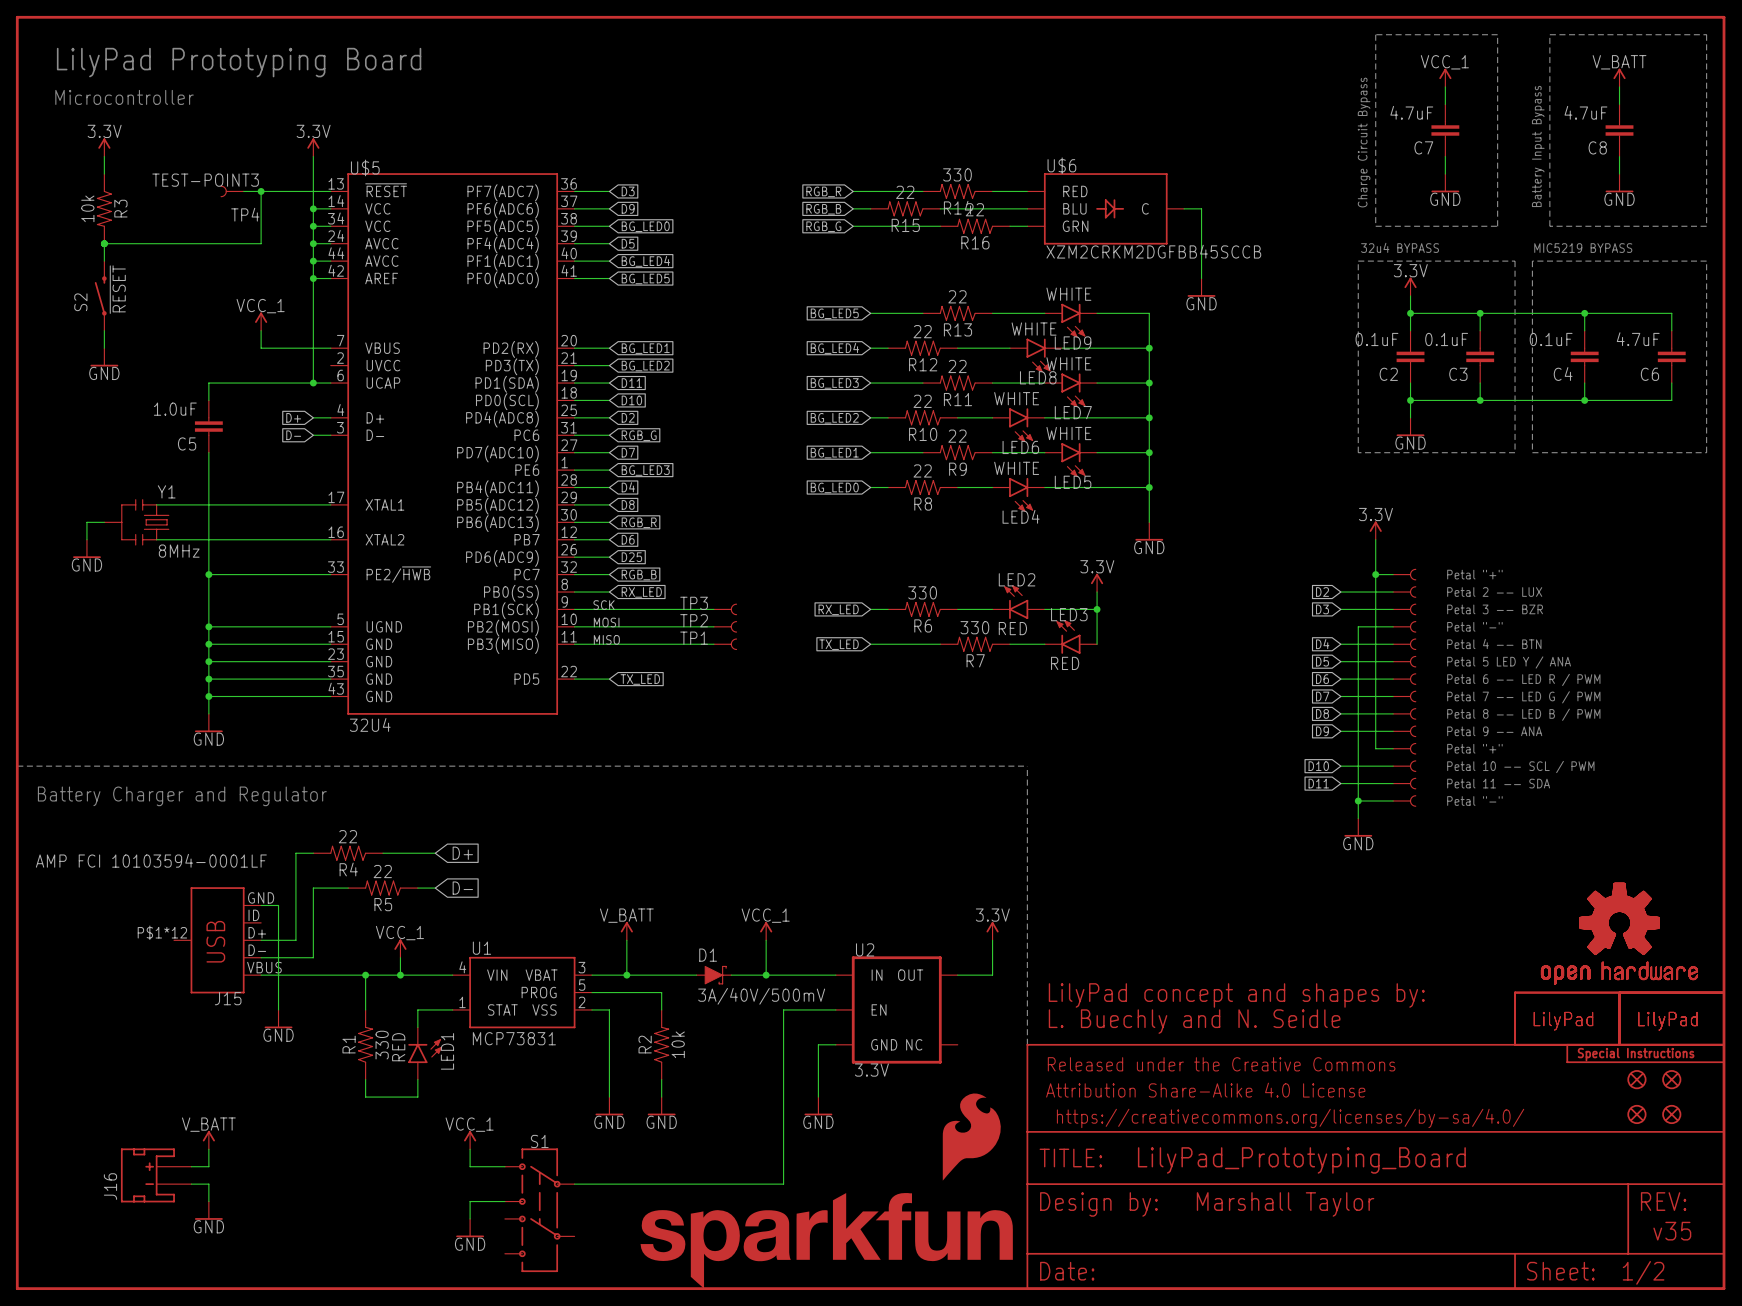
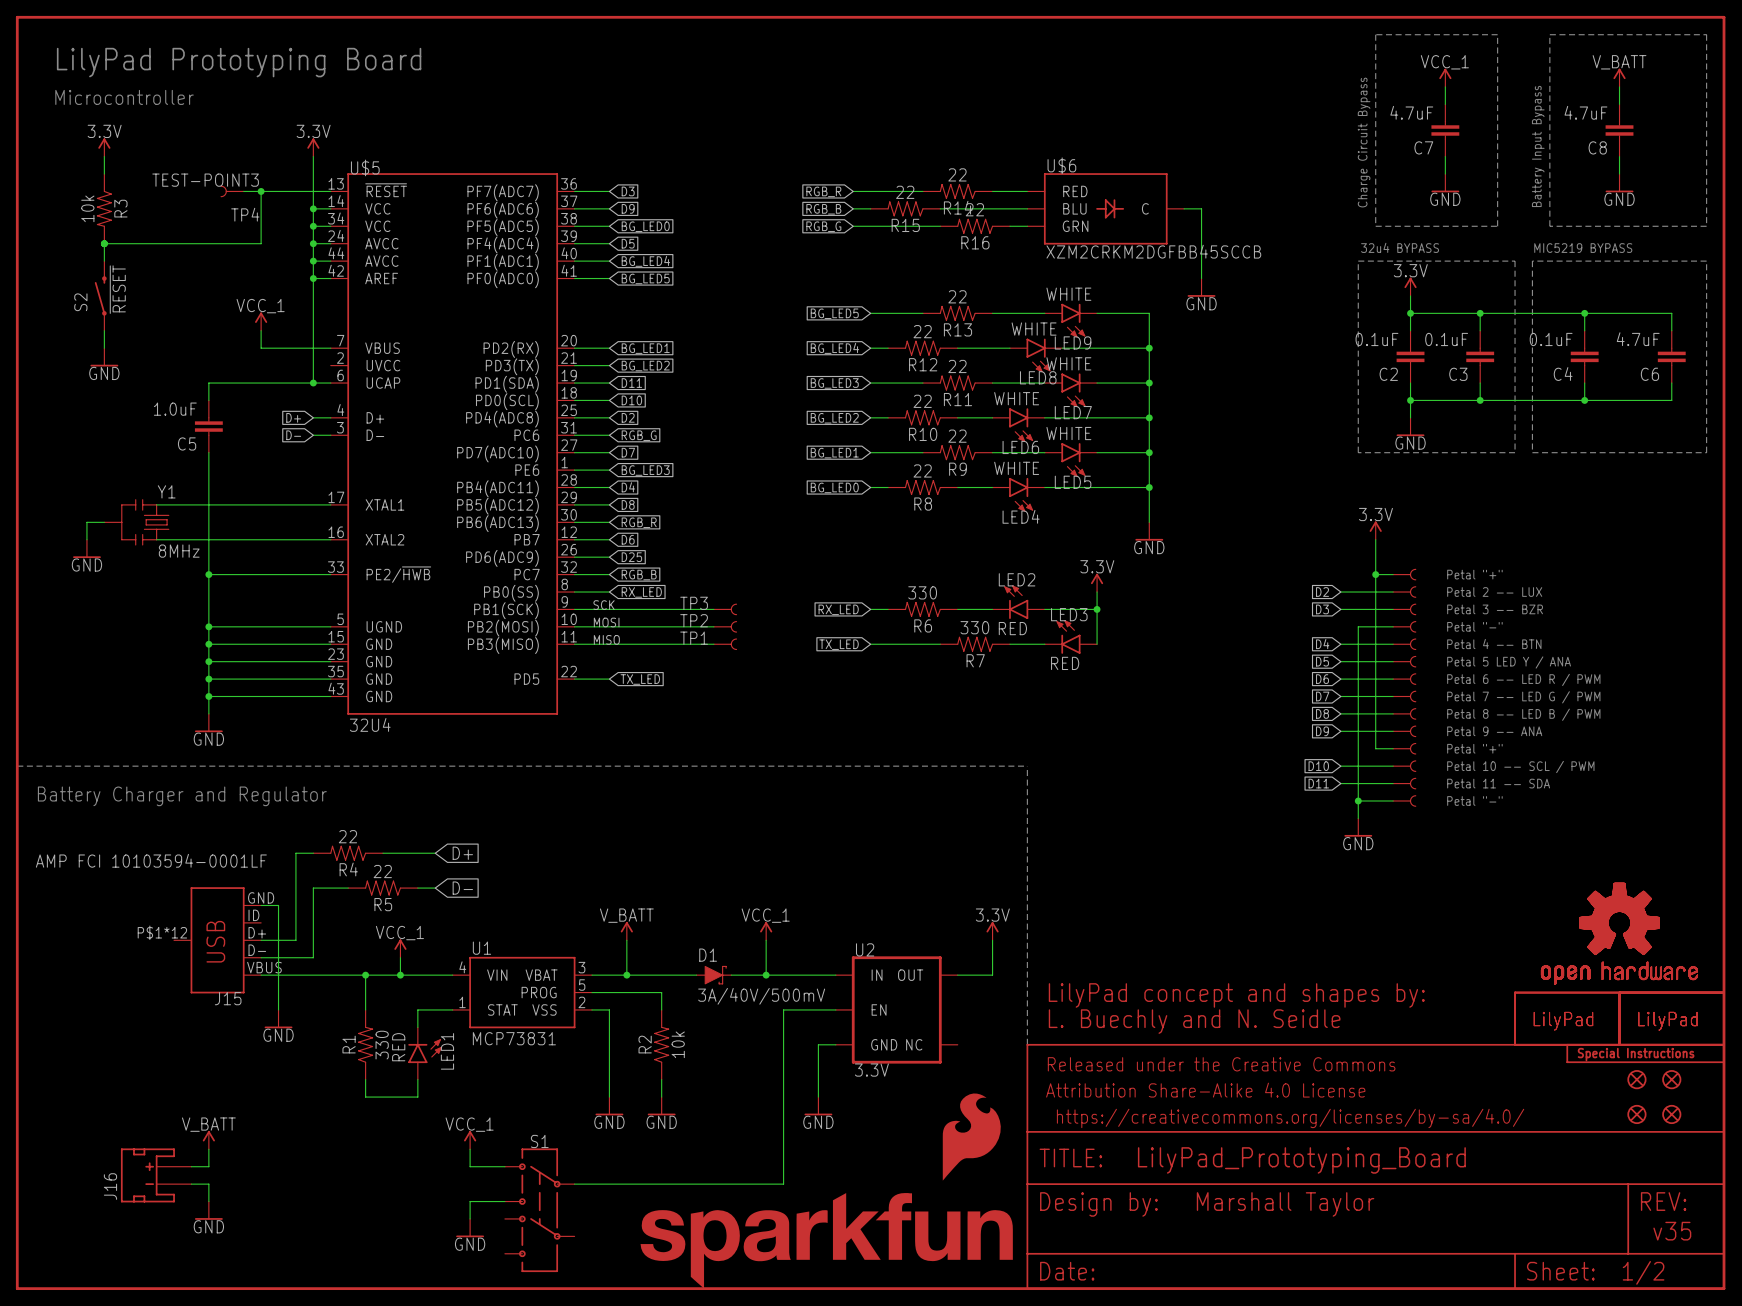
R14 value: 330 (957, 174) -> 22 (957, 174)

